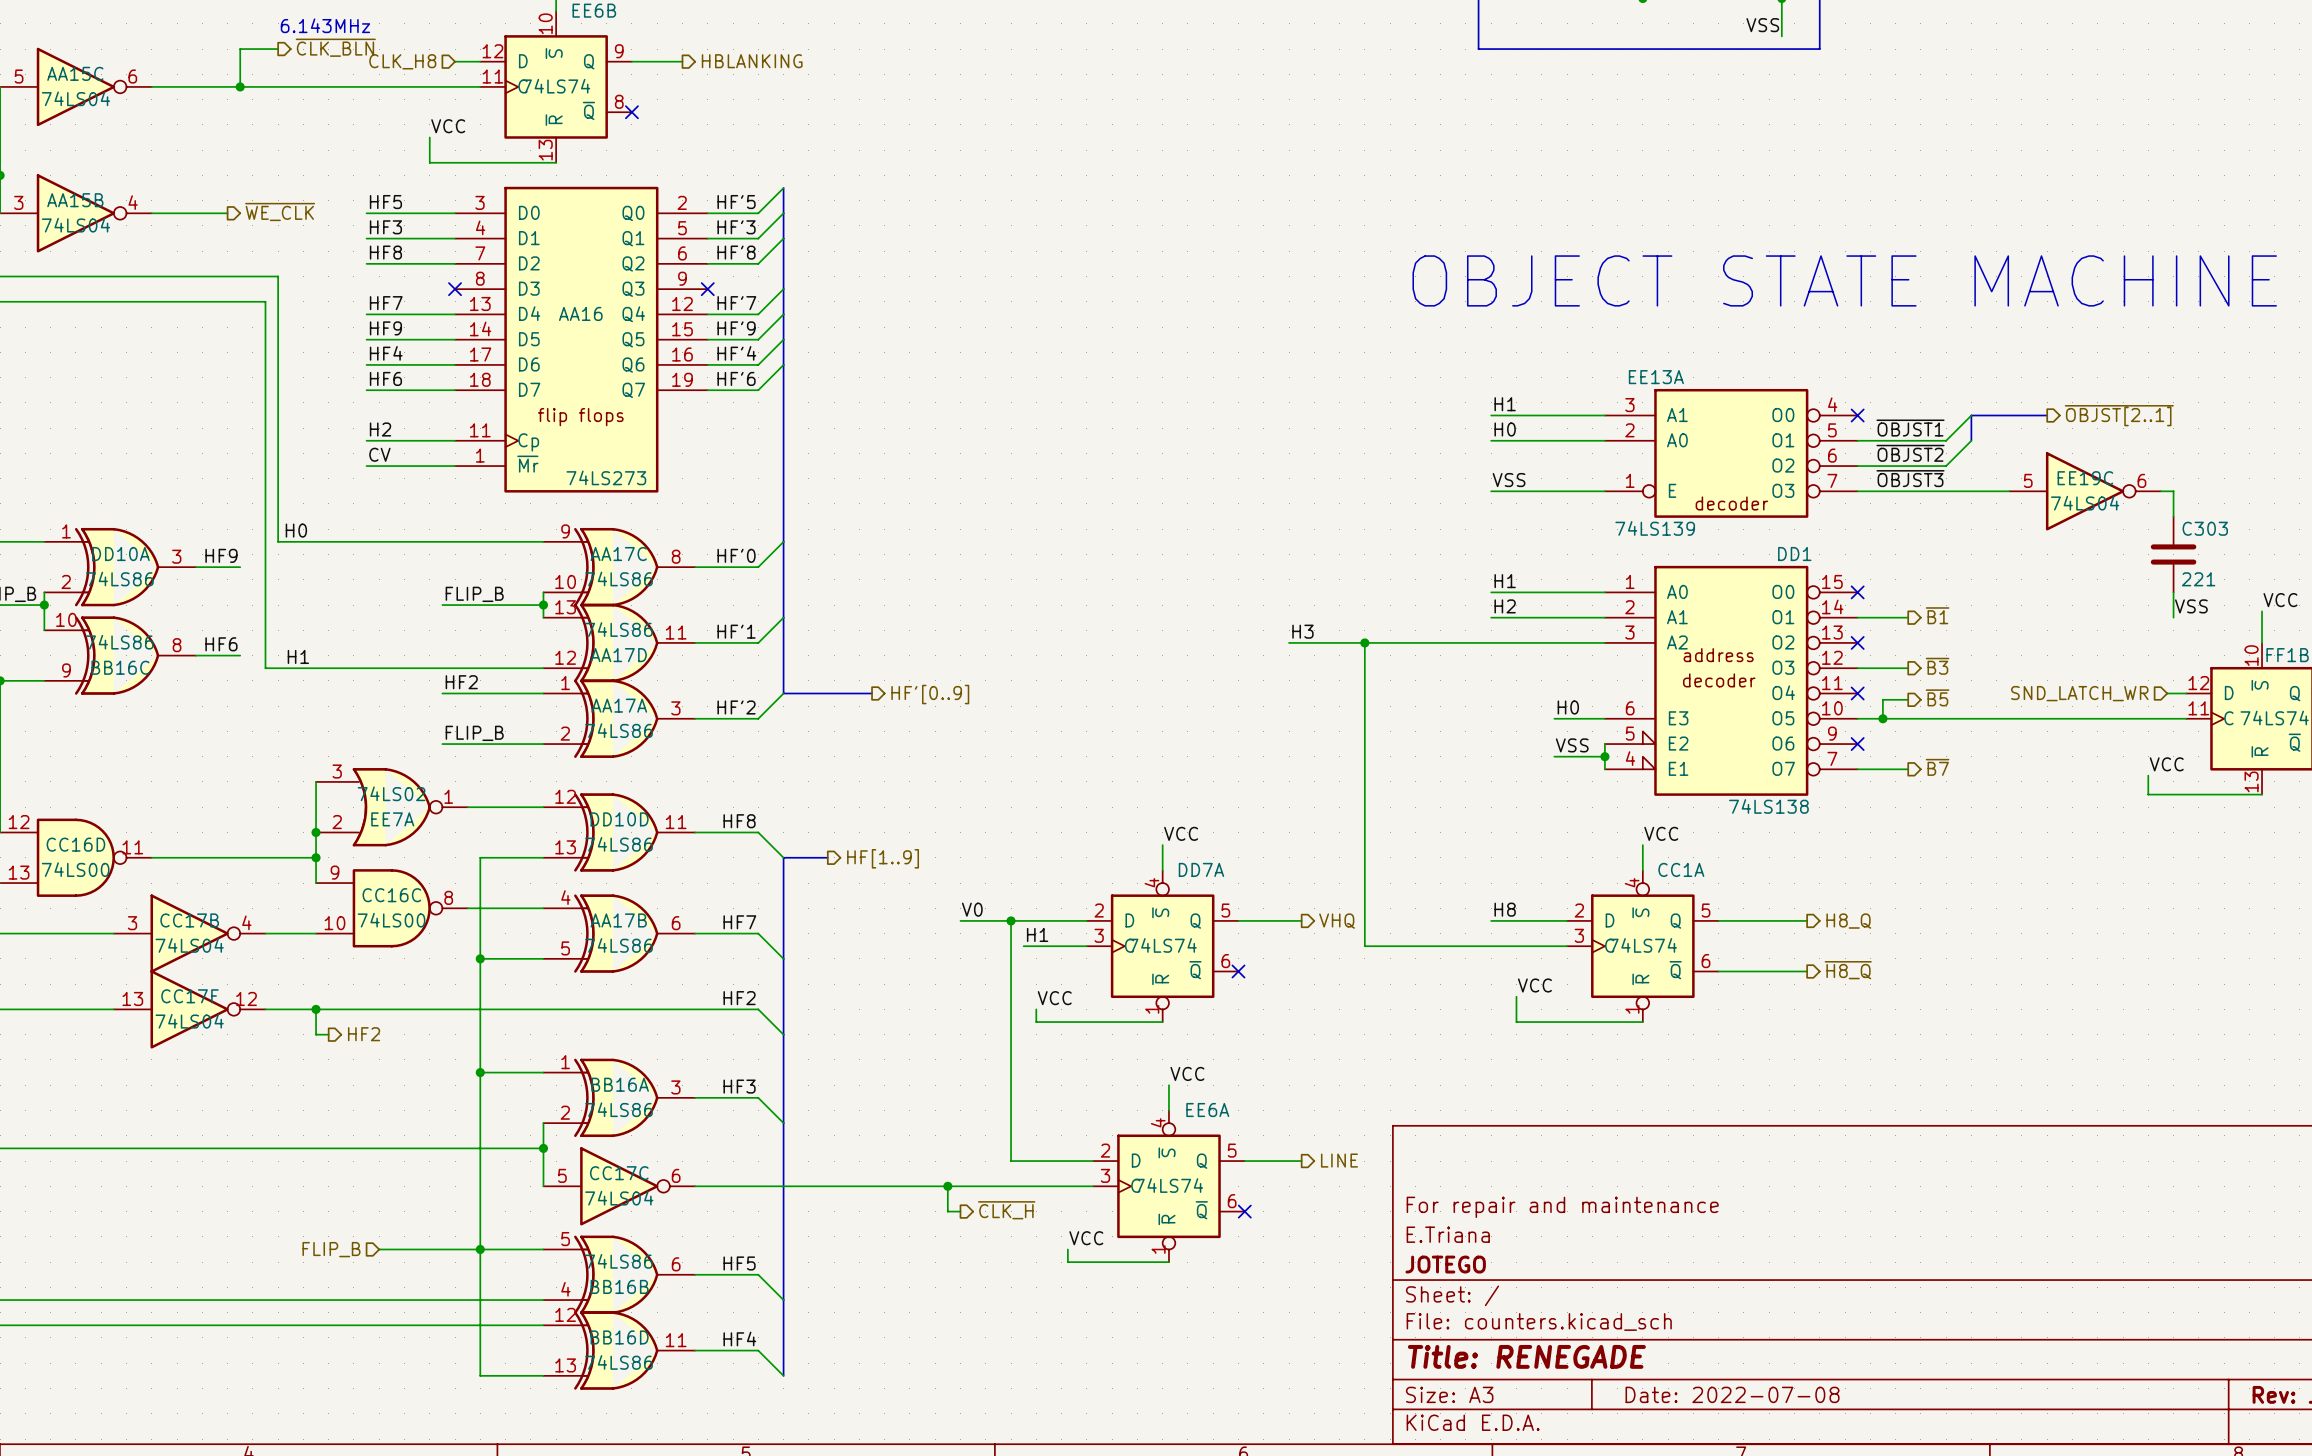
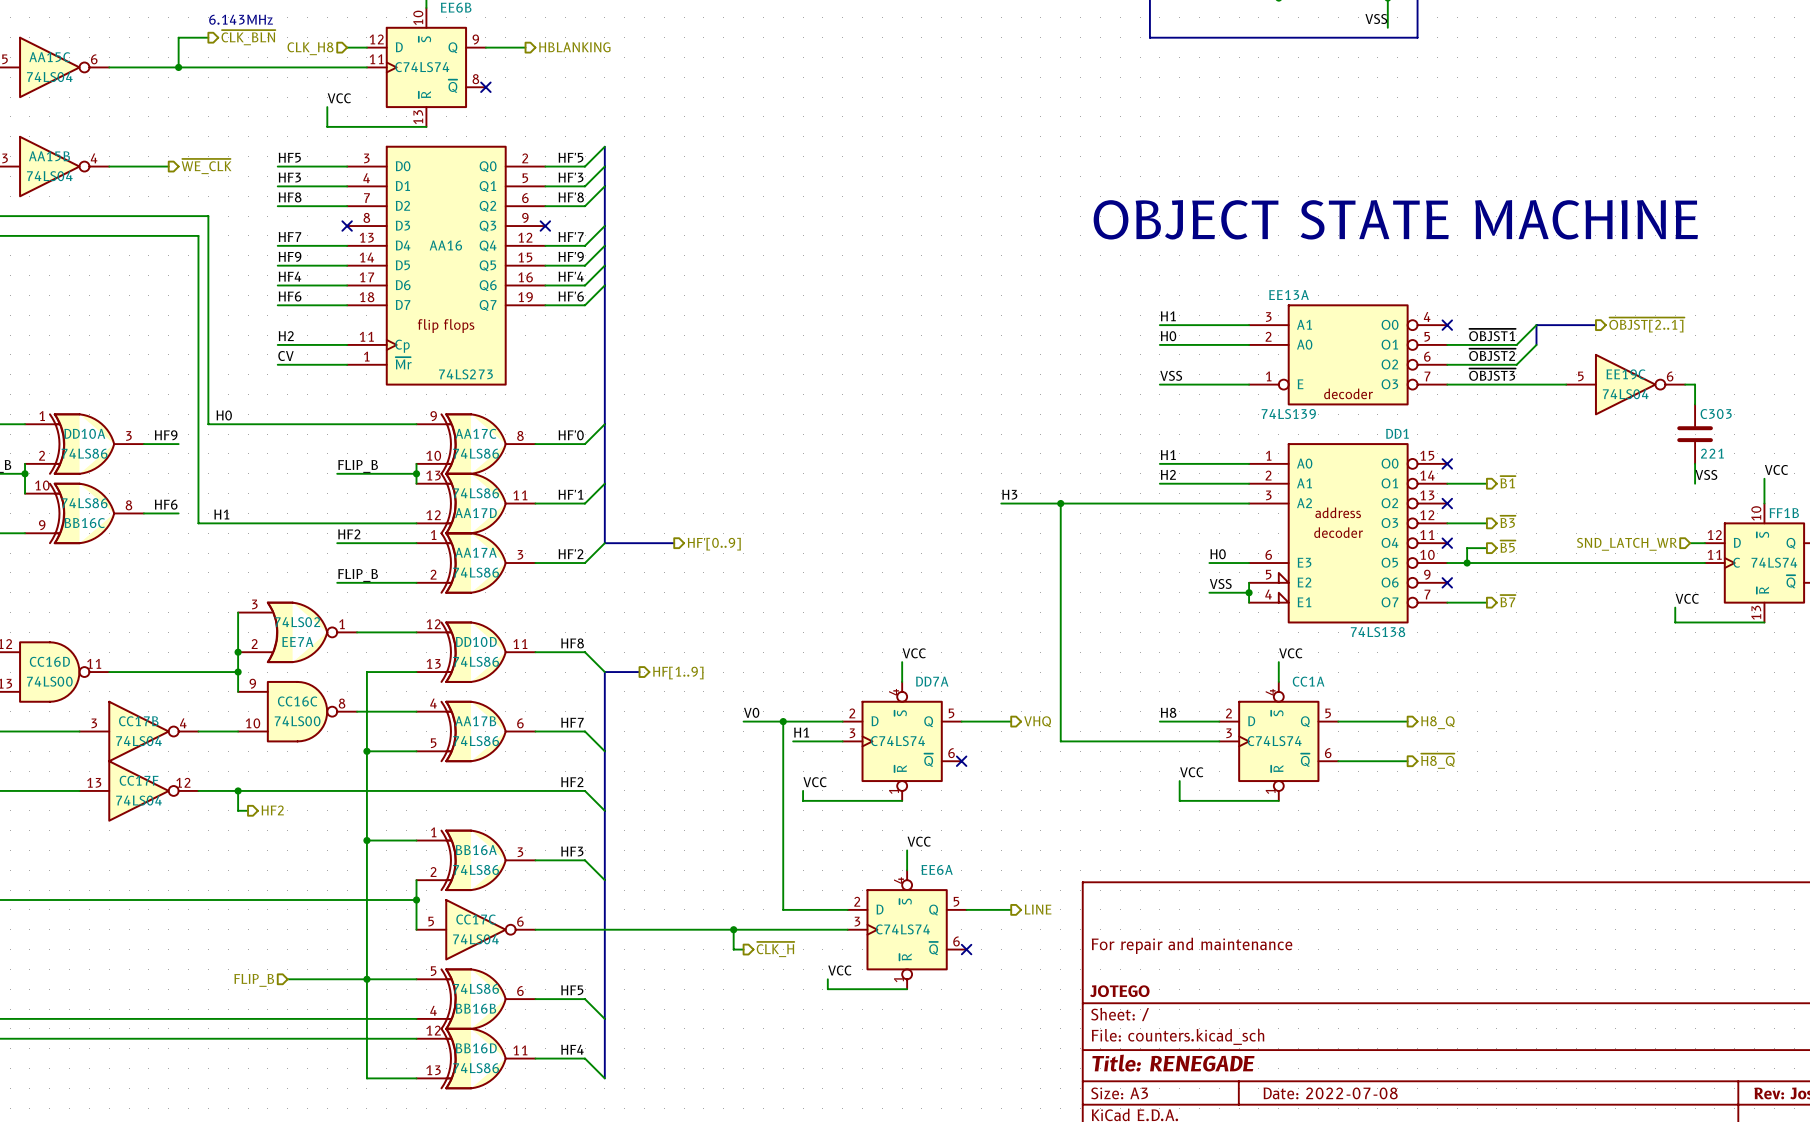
title block: E.Triana (1448, 1234) -> none

